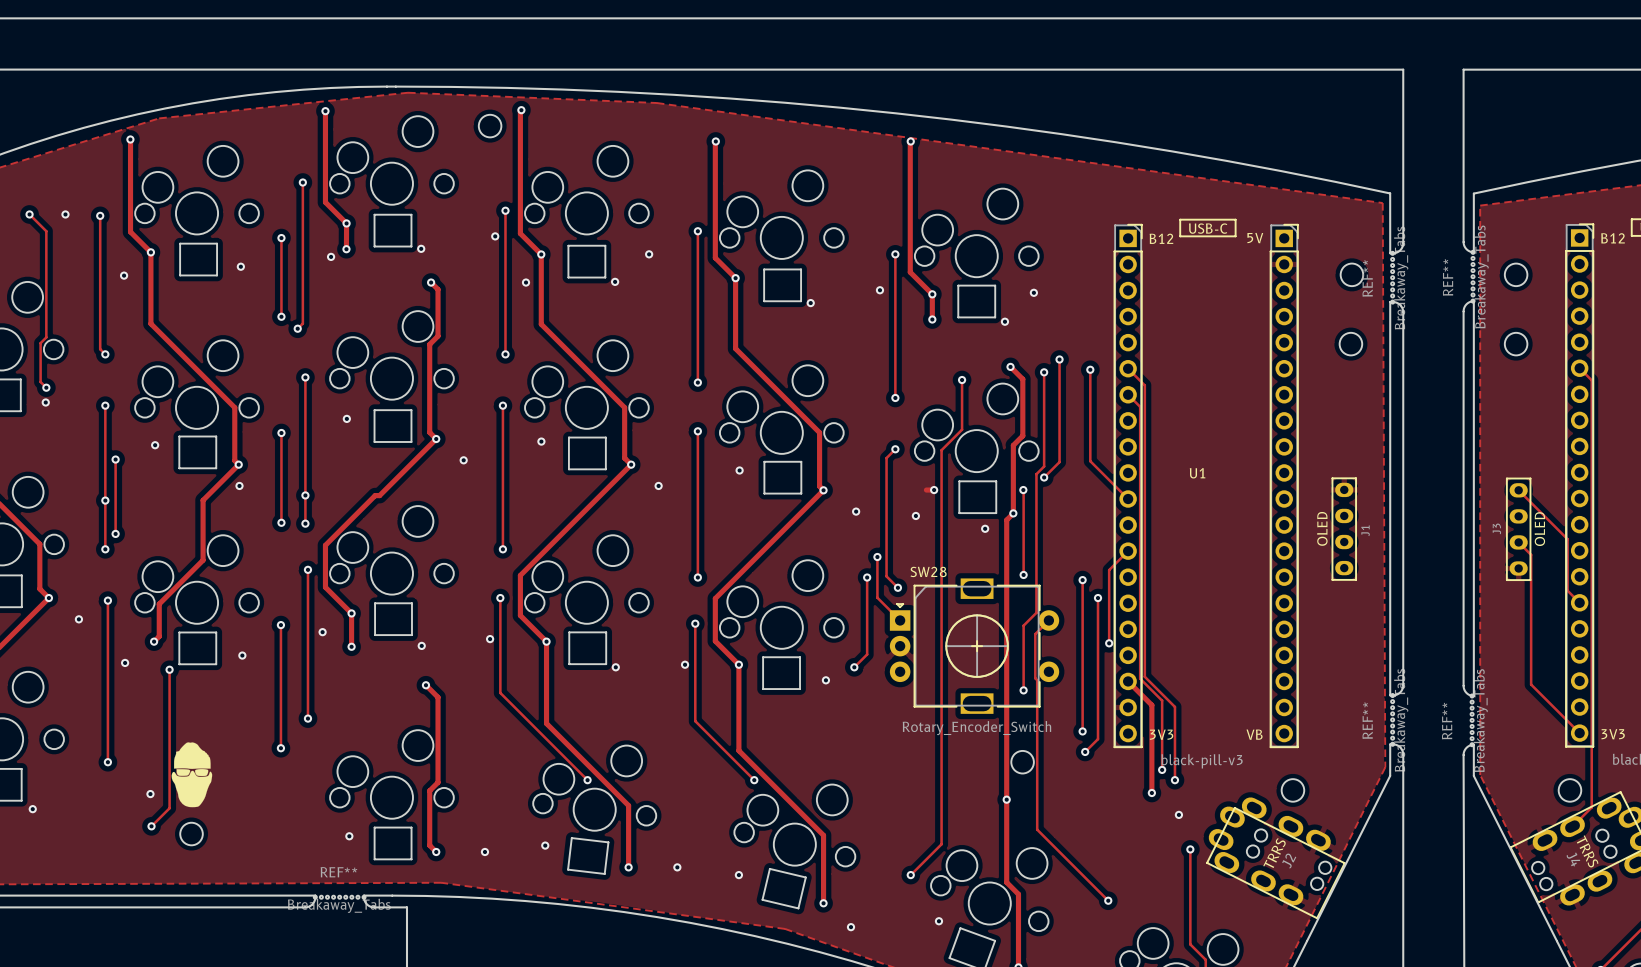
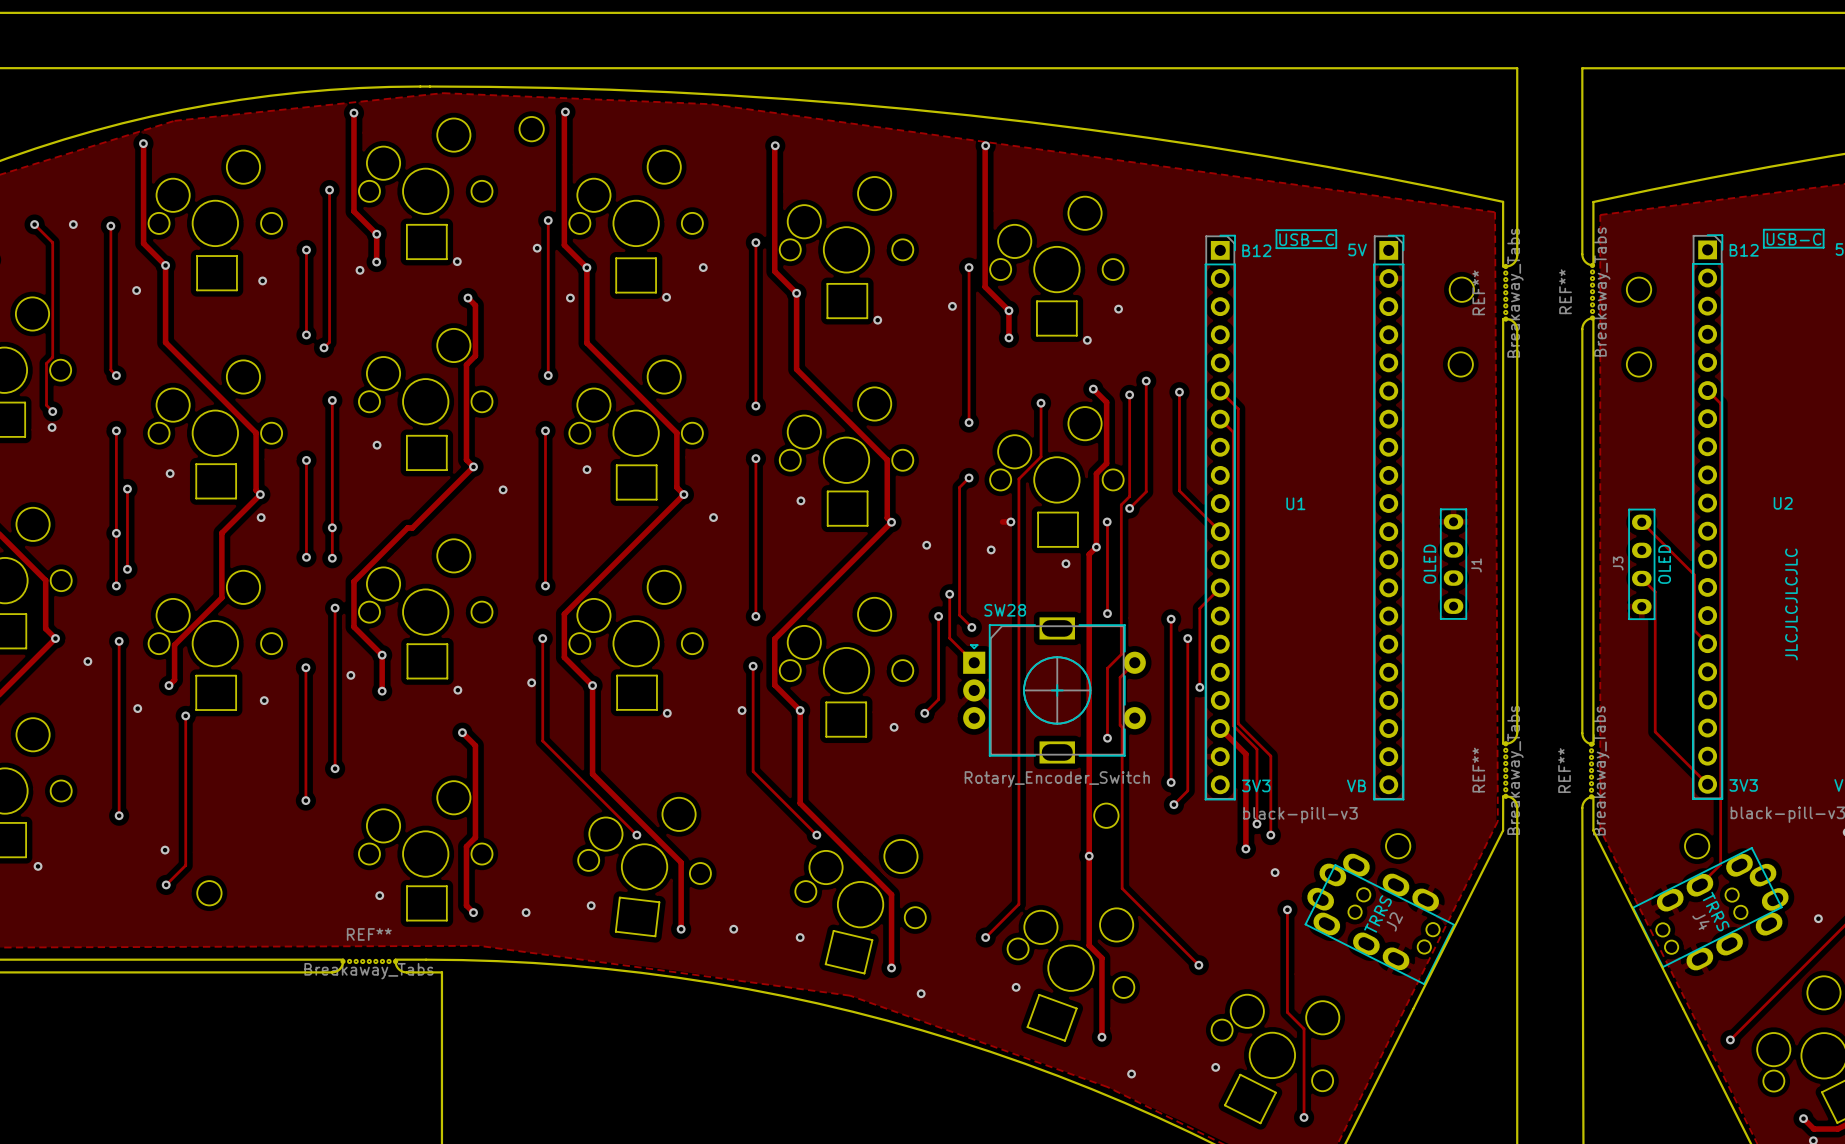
drawing: [171, 742, 213, 808] -> none

